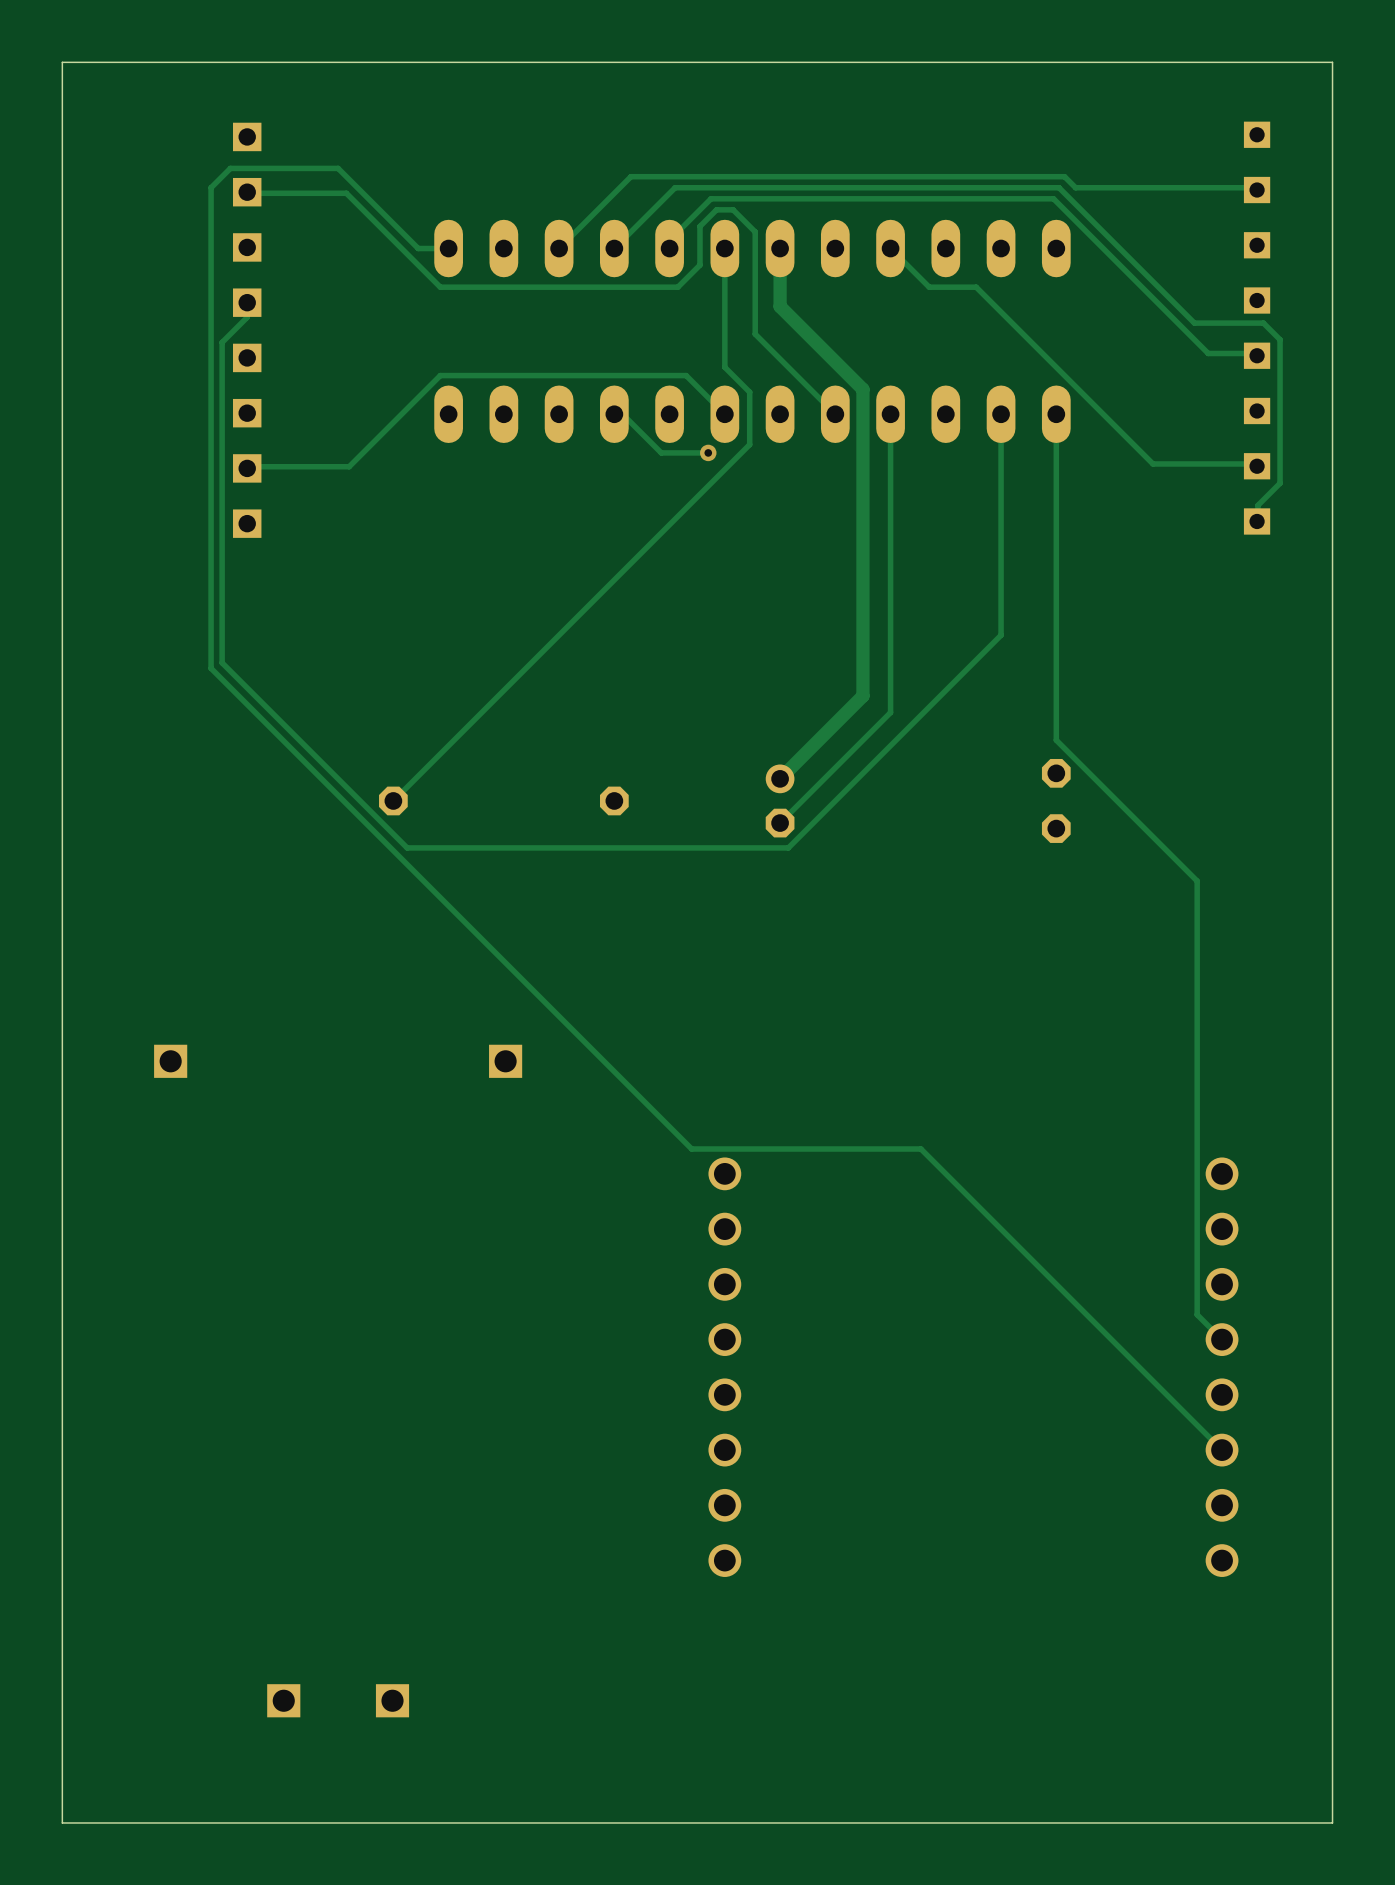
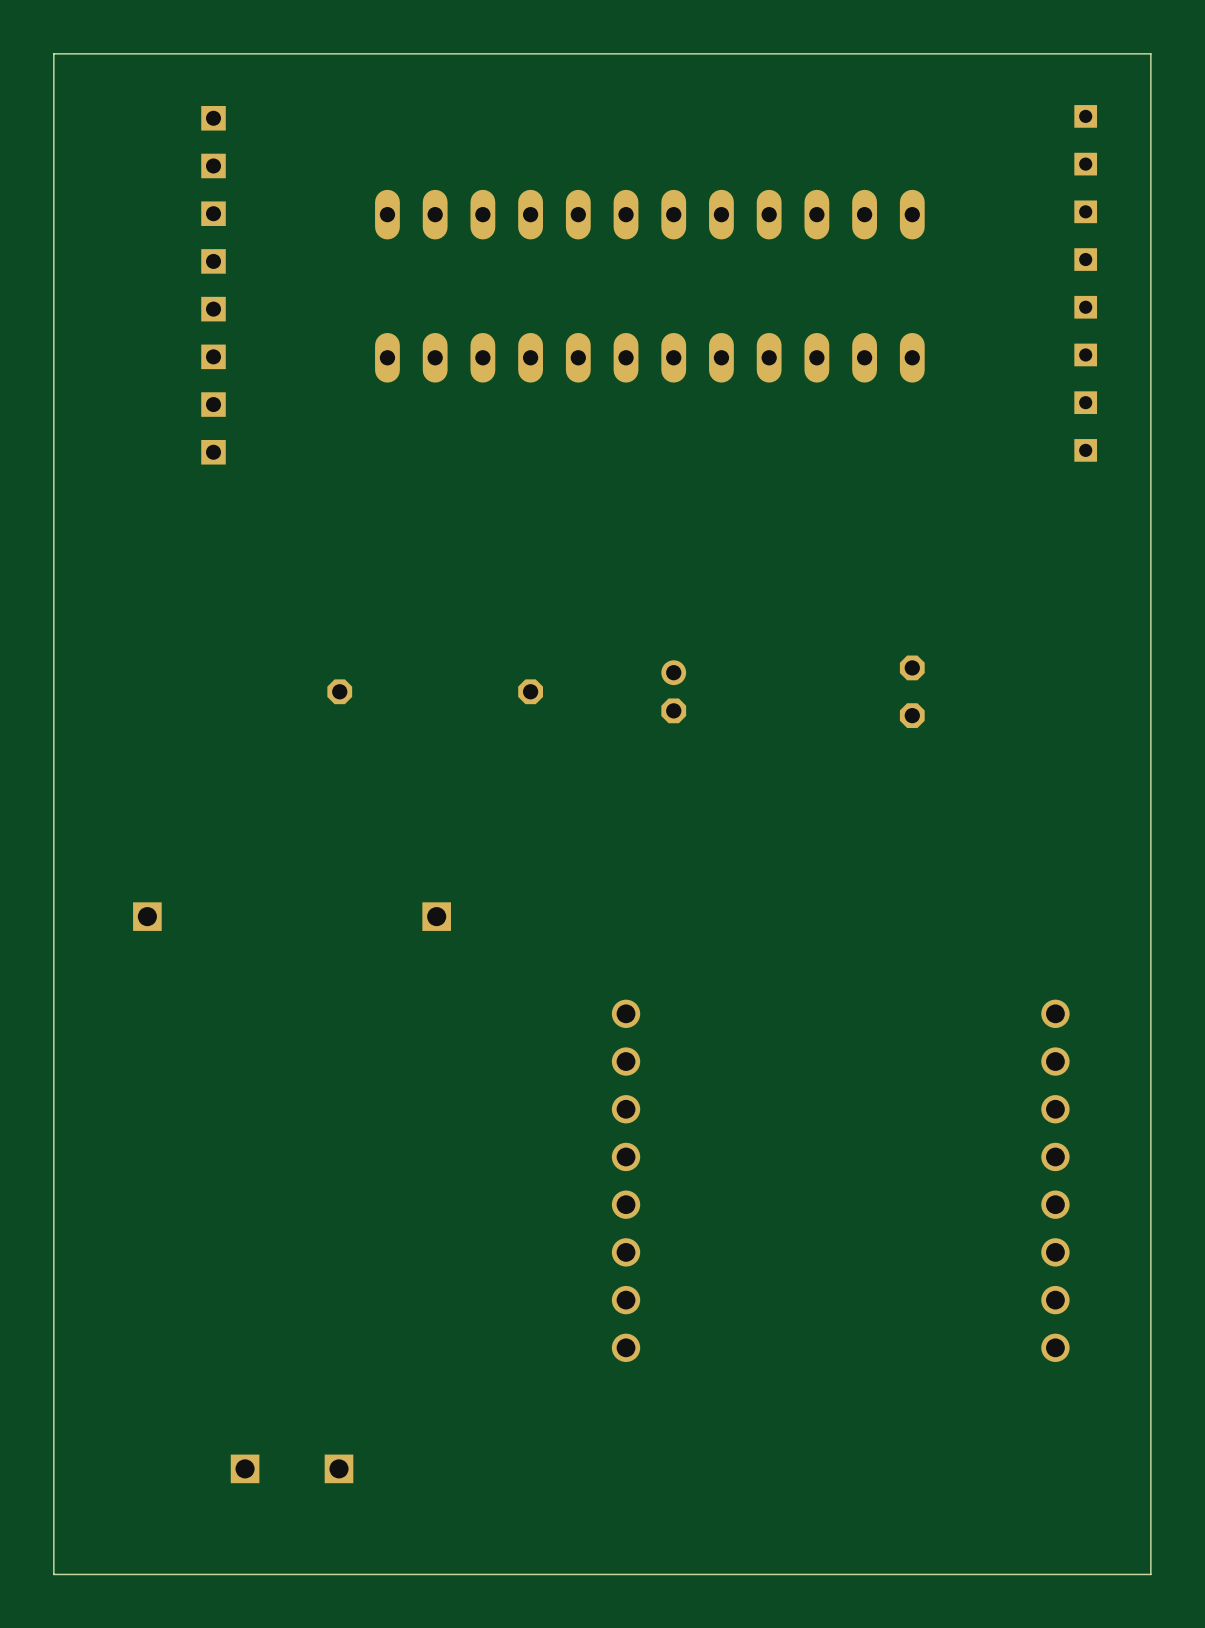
track: (1257, 190) (1255, 187) (1075, 187) (1064, 176) (630, 176) (559, 248) -> none
track: (247, 192) (346, 193) (440, 287) (677, 287) (699, 265) (699, 226) (716, 209) (733, 209) (755, 231) (755, 334) (835, 414) -> none
track: (448, 248) (418, 248) (338, 168) (230, 168) (211, 187) (211, 668) (691, 1149) (920, 1149) (1222, 1450) -> none
track: (614, 248) (675, 187) (1059, 187) (1194, 323) (1263, 323) (1280, 339) (1280, 483) (1257, 505) (1257, 521) -> none
track: (669, 248) (669, 240) (711, 198) (1053, 198) (1208, 353) (1255, 353) (1257, 355) -> none
track: (724, 248) (724, 367) (749, 392) (749, 444) (393, 800) -> none
track: (780, 248) (780, 306) (862, 389) (862, 696) (780, 778) -> none
track: (890, 248) (929, 287) (976, 287) (1152, 463) (1255, 463) (1257, 466) -> none
track: (247, 302) (246, 317) (222, 342) (222, 662) (407, 847) (788, 847) (1001, 635) (1001, 414) -> none
track: (614, 414) (622, 414) (661, 452) (708, 452) -> none
track: (724, 414) (686, 375) (440, 375) (349, 466) (249, 466) (247, 468) -> none
track: (890, 414) (890, 712) (780, 823) -> none
track: (1056, 414) (1056, 740) (1197, 881) (1197, 1314) (1222, 1339) -> none
via: (708, 452) -> none

